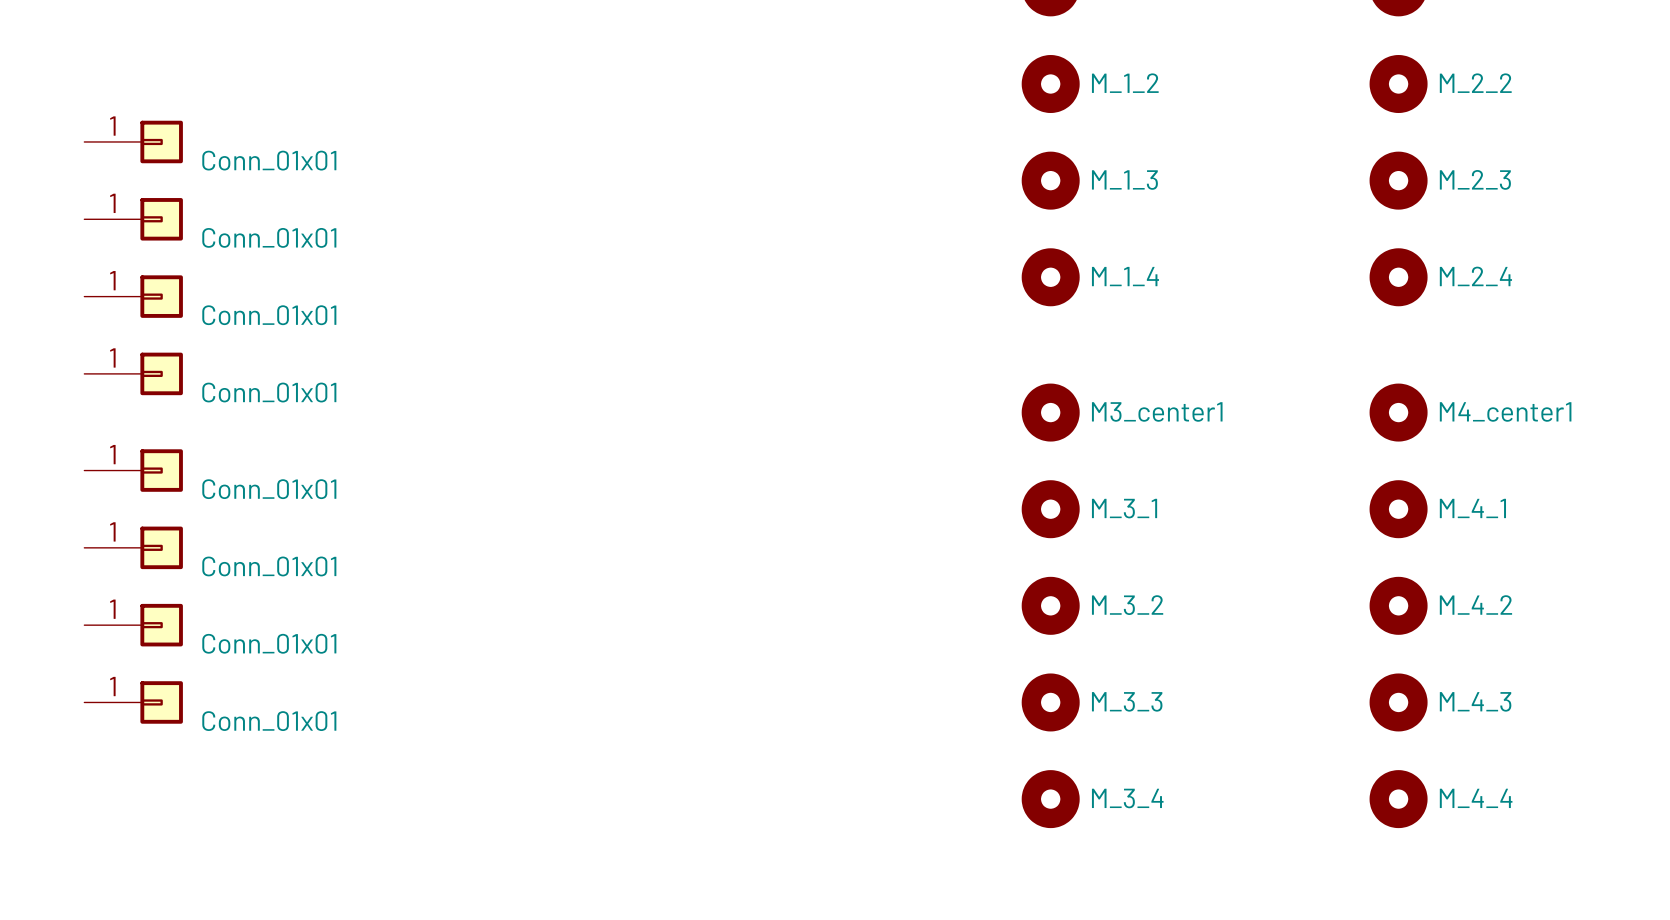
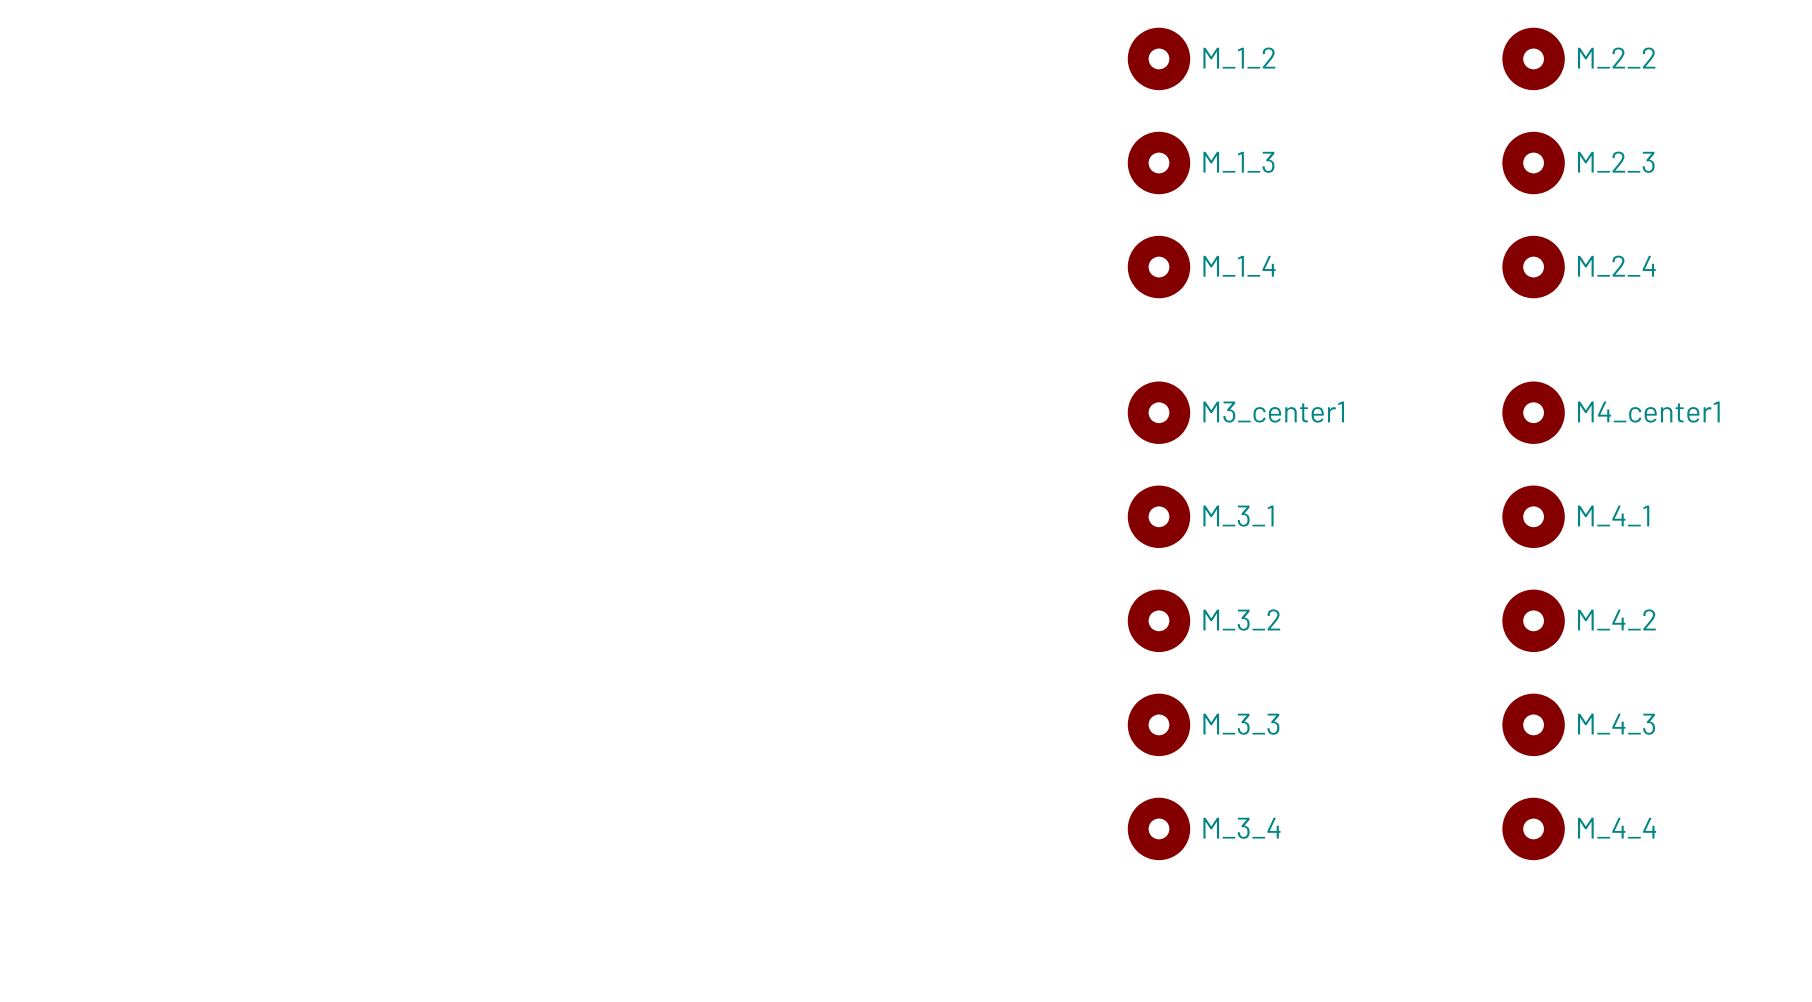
part: Conn_01x01 (133, 141) -> none
part: Conn_01x01 (133, 219) -> none
part: Conn_01x01 (133, 296) -> none
part: Conn_01x01 (133, 373) -> none
part: Conn_01x01 (133, 470) -> none
part: Conn_01x01 (133, 547) -> none
part: Conn_01x01 (133, 625) -> none
part: Conn_01x01 (133, 702) -> none

